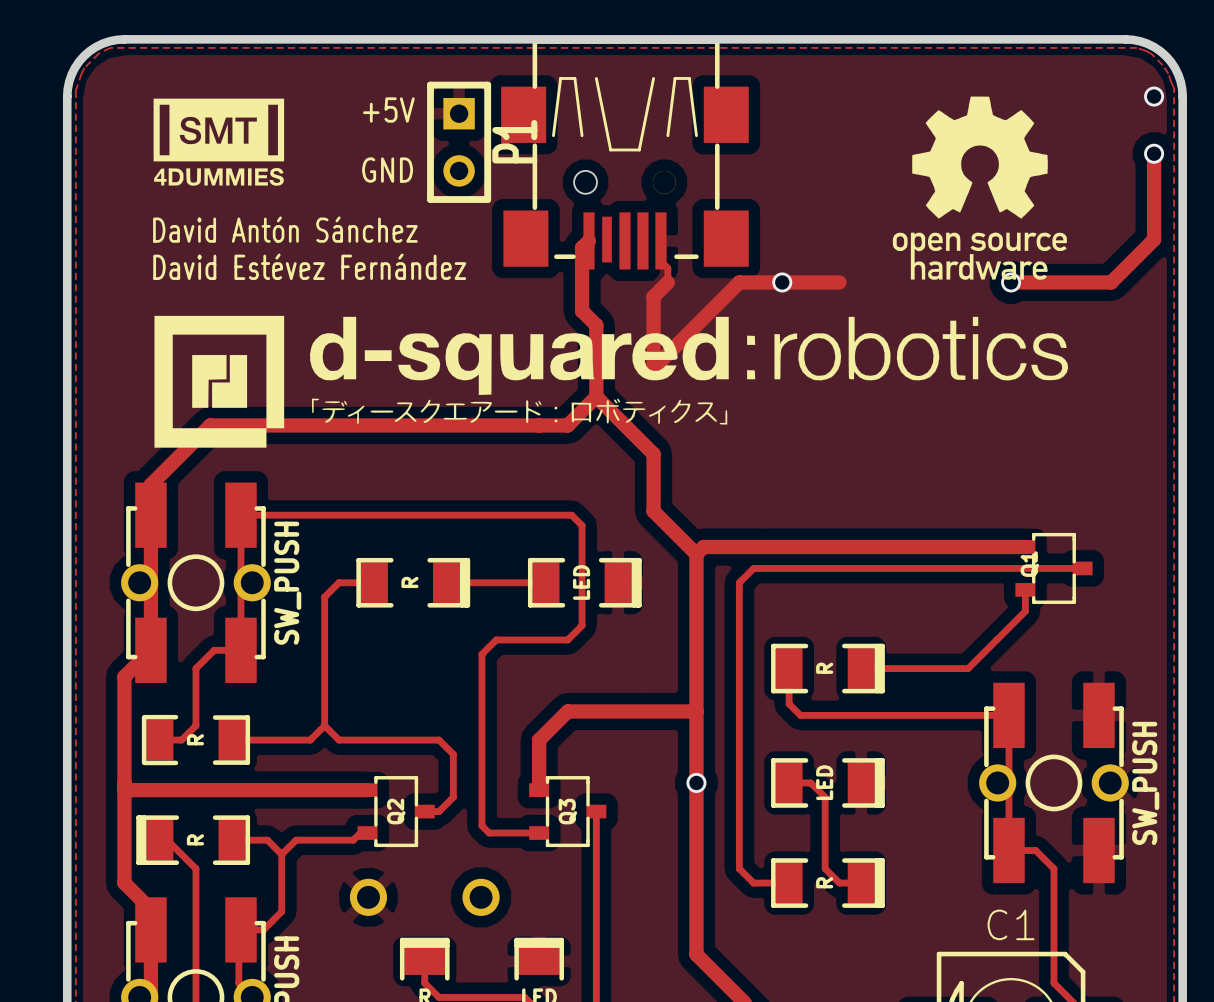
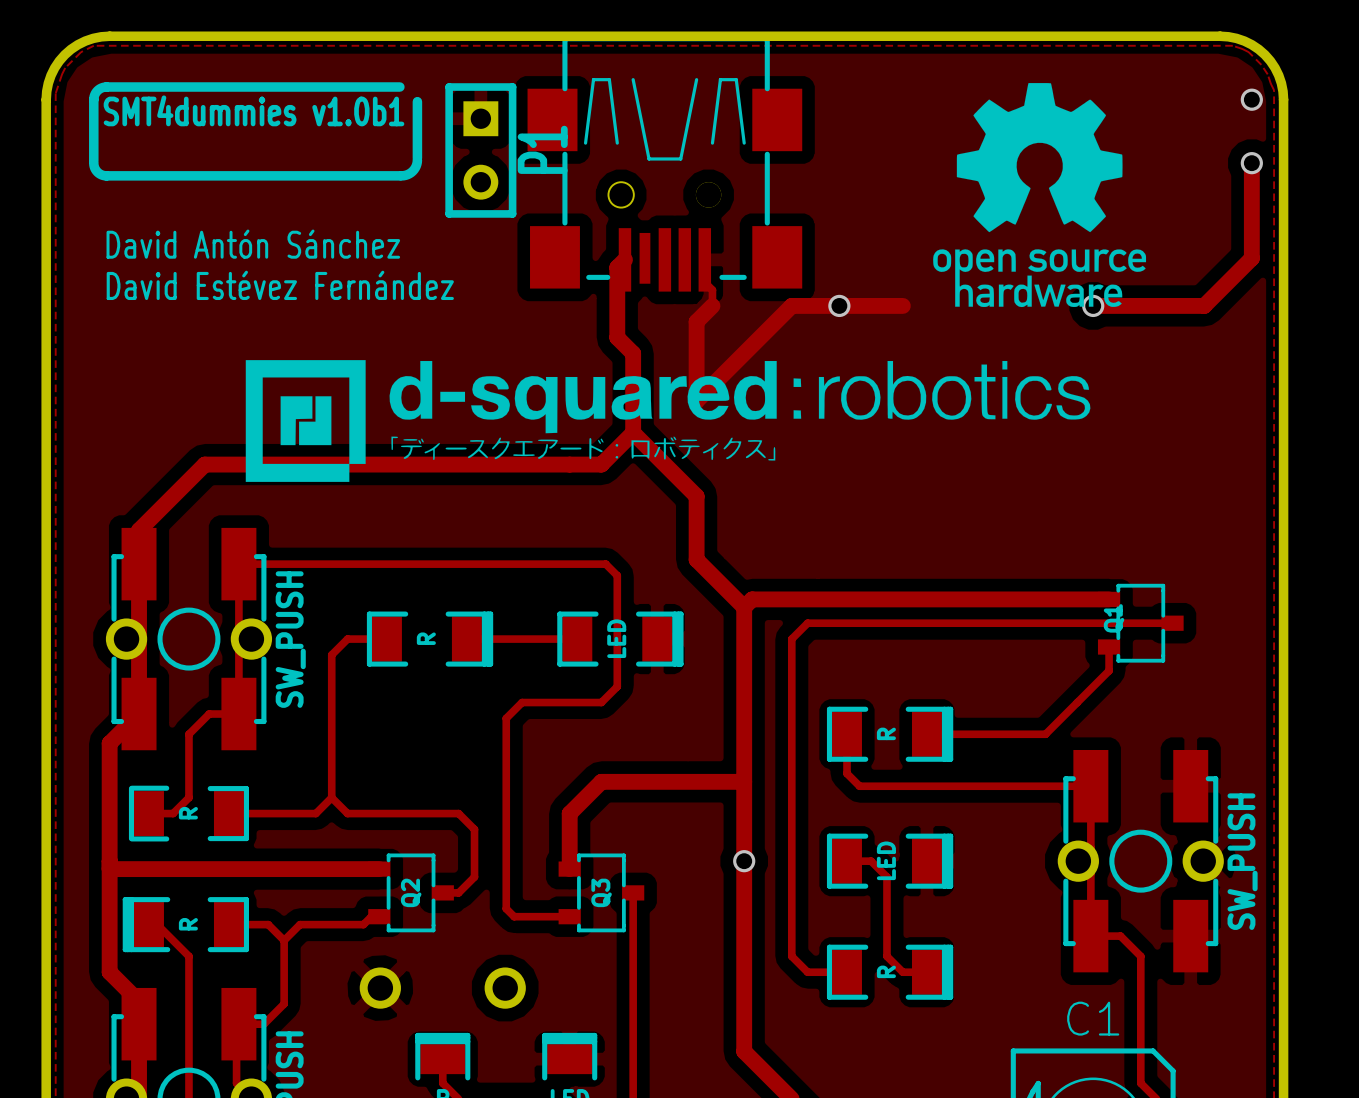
line: none -> (399, 87) (103, 87) (96, 91) (93, 98) (93, 160)
drawing shape: [892, 96, 1067, 280] -> [933, 83, 1147, 308]
drawing: [153, 98, 285, 186] -> none
line: none -> (417, 101) (417, 158)
text: none -> SMT4dummies v1.0b1 (254, 110)
text: +5V (388, 110) -> none
line: none -> (417, 159) (412, 171) (401, 175)
line: none -> (93, 163) (97, 172) (106, 175) (399, 175)
text: GND (387, 170) -> none
text position: David Antón Sánchez (285, 229) -> David Antón Sánchez (253, 244)
text position: David Estévez Fernández (309, 266) -> David Estévez Fernández (280, 285)
drawing shape: [154, 315, 1069, 448] -> [245, 360, 1091, 482]

